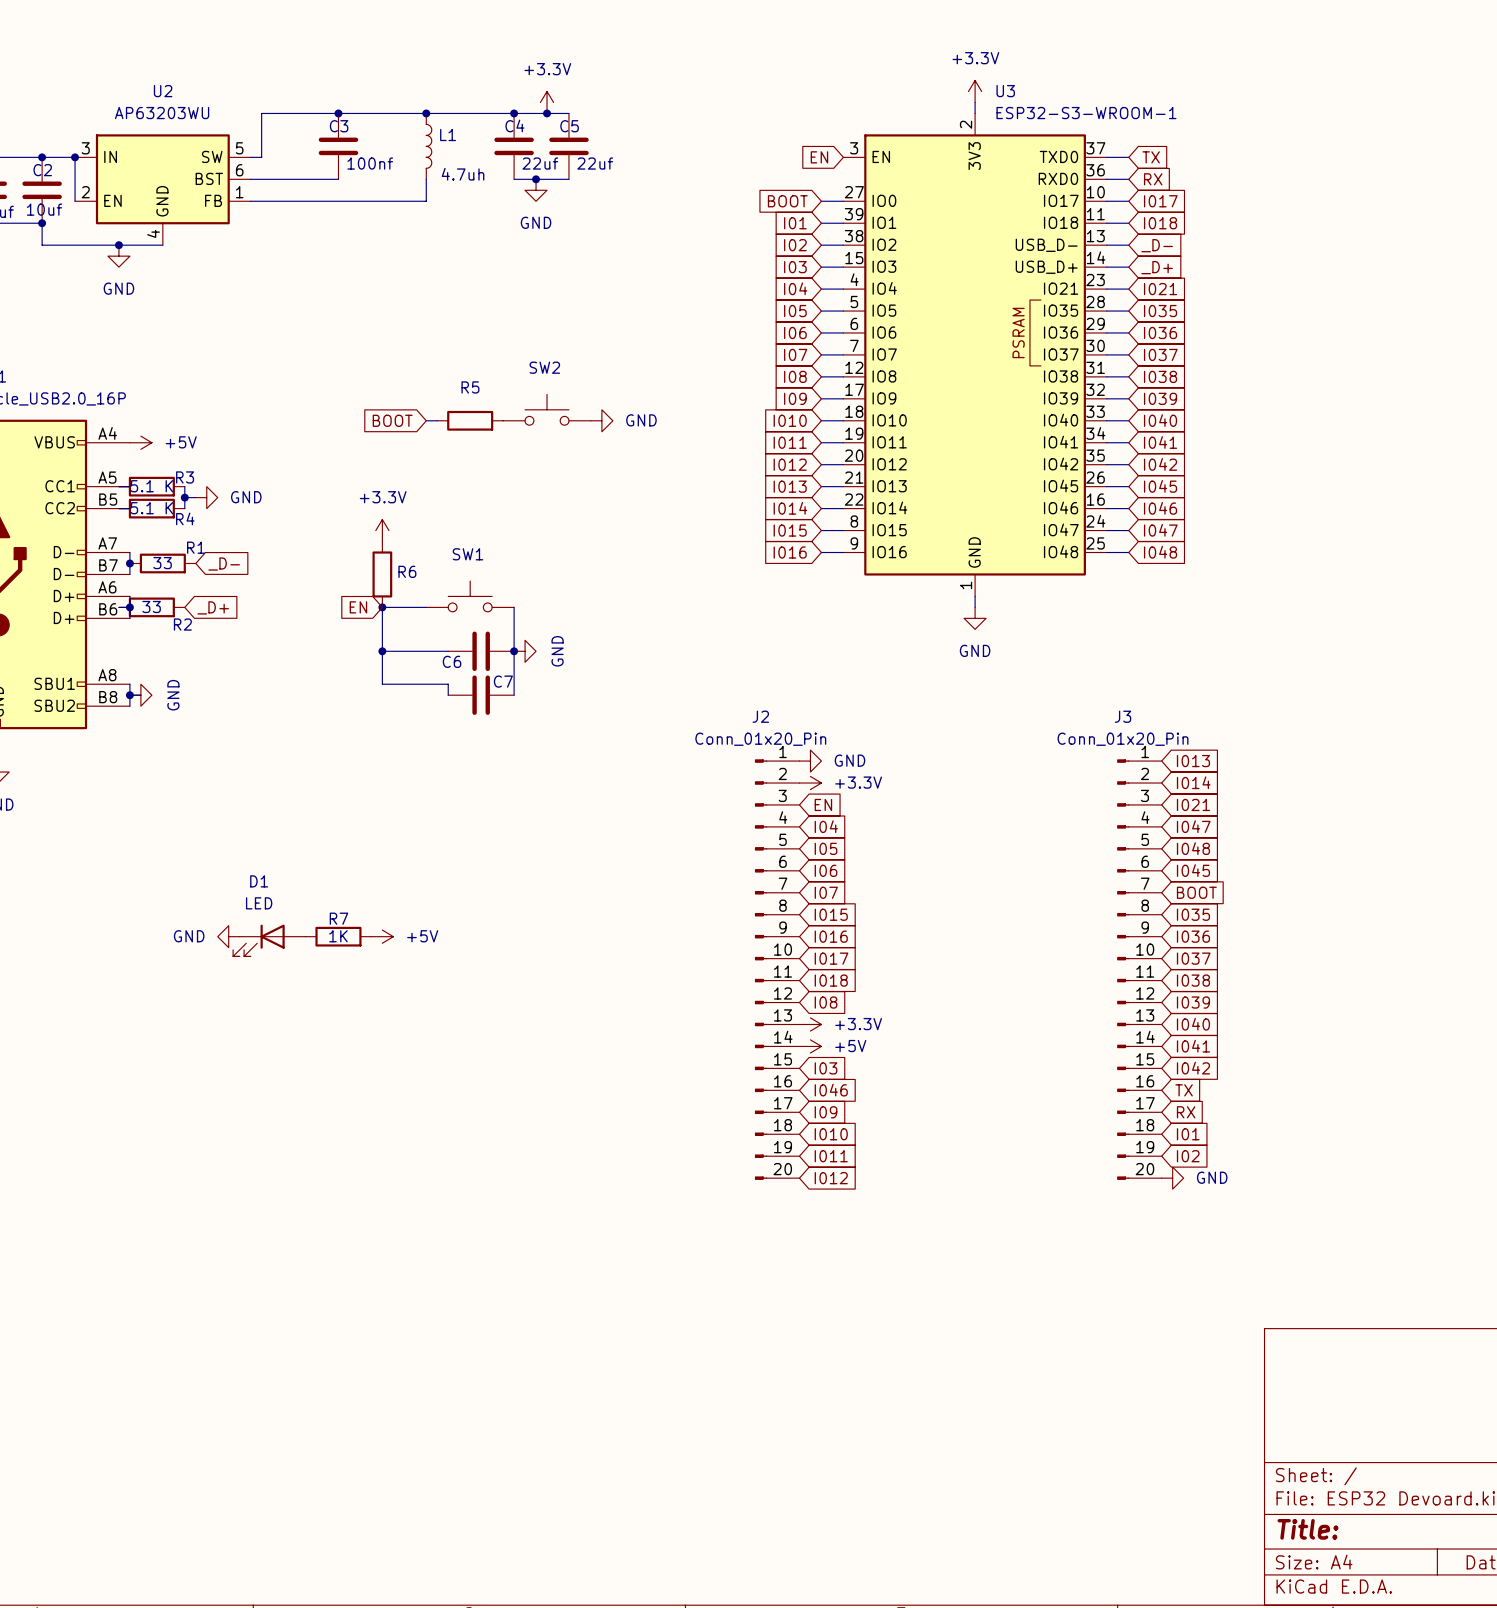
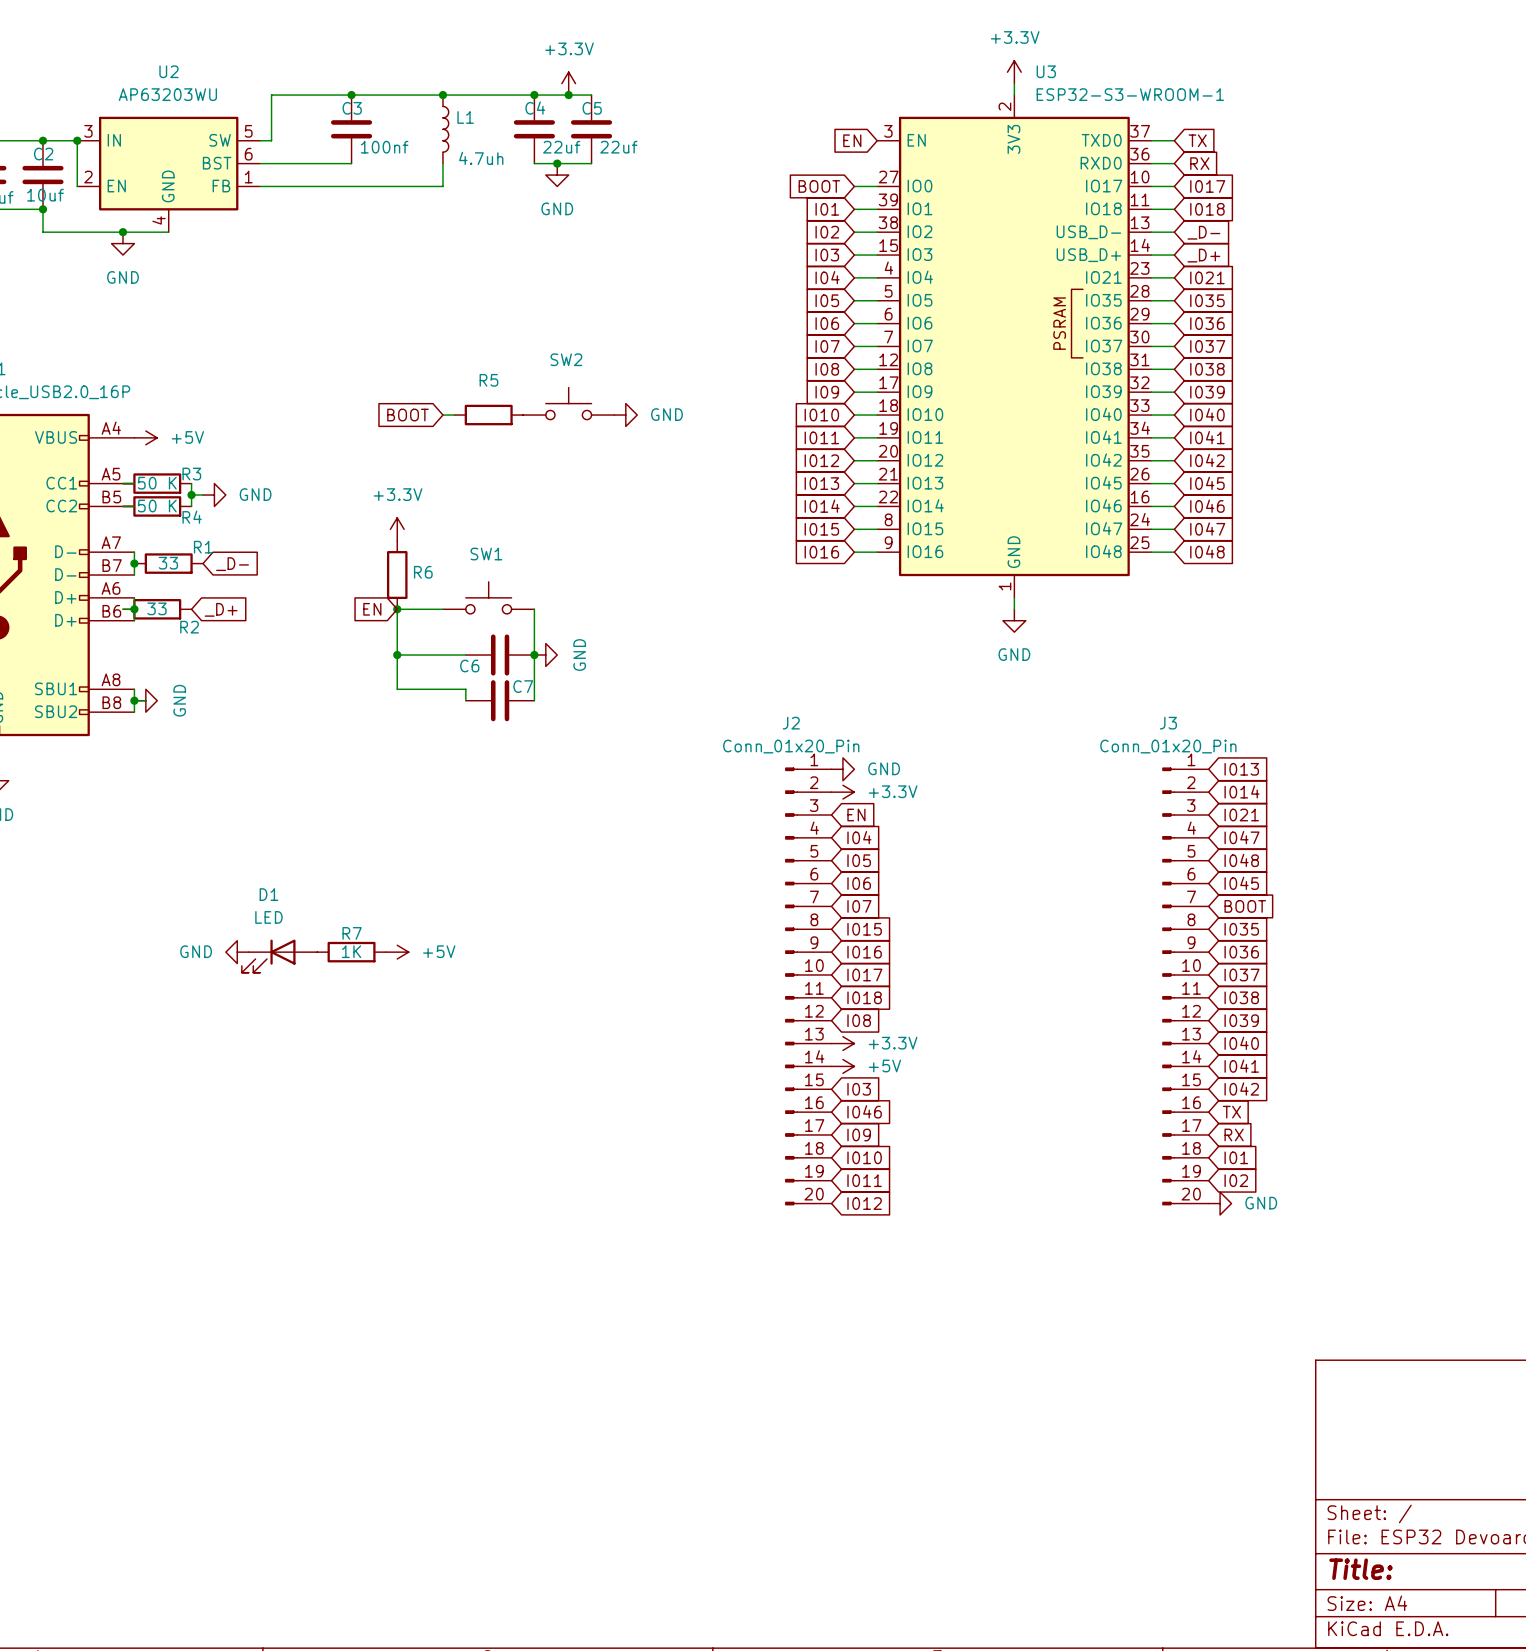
R3 value: 5.1 K (151, 486) -> 50 K (157, 483)
R4 value: 5.1 K (151, 508) -> 50 K (157, 506)

